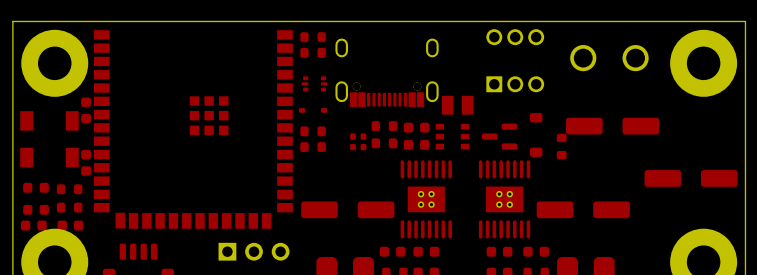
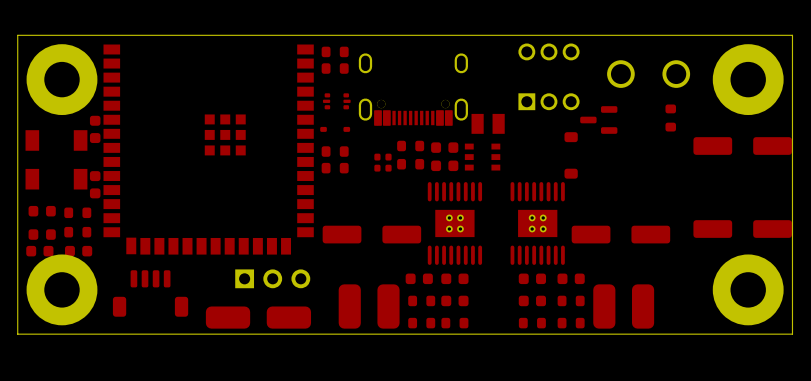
part: (612, 126) -> none
part: none -> (742, 146)
part position: (499, 136) -> (598, 119)
part position: (561, 146) -> (670, 118)
part: (691, 178) -> none
part: none -> (742, 229)

